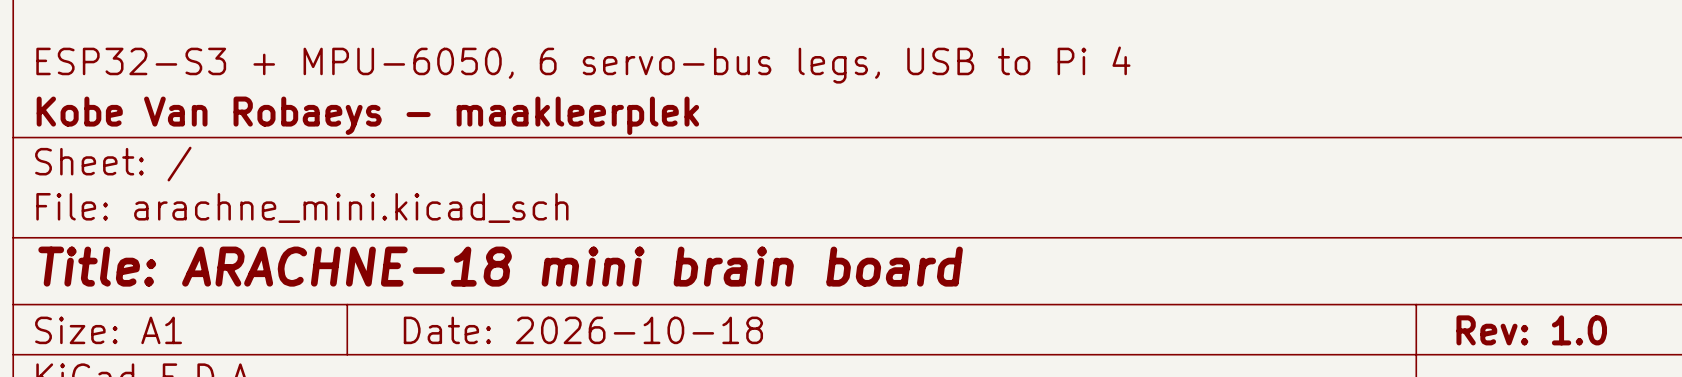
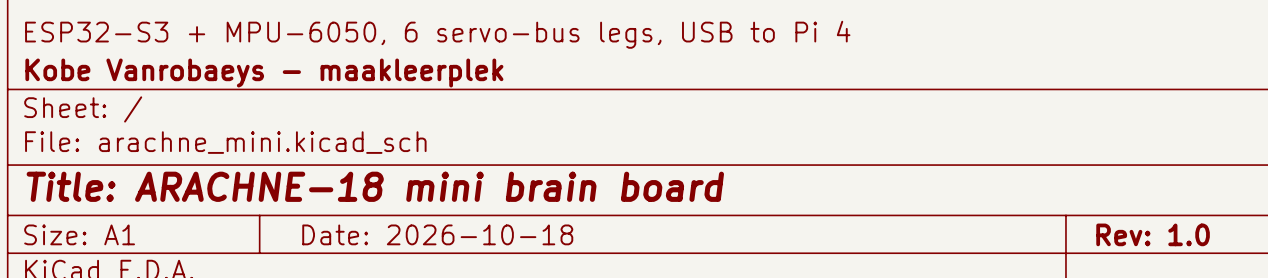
title block: Kobe Van Robaeys - maakleerplek (367, 115) -> Kobe Vanrobaeys - maakleerplek (264, 73)

